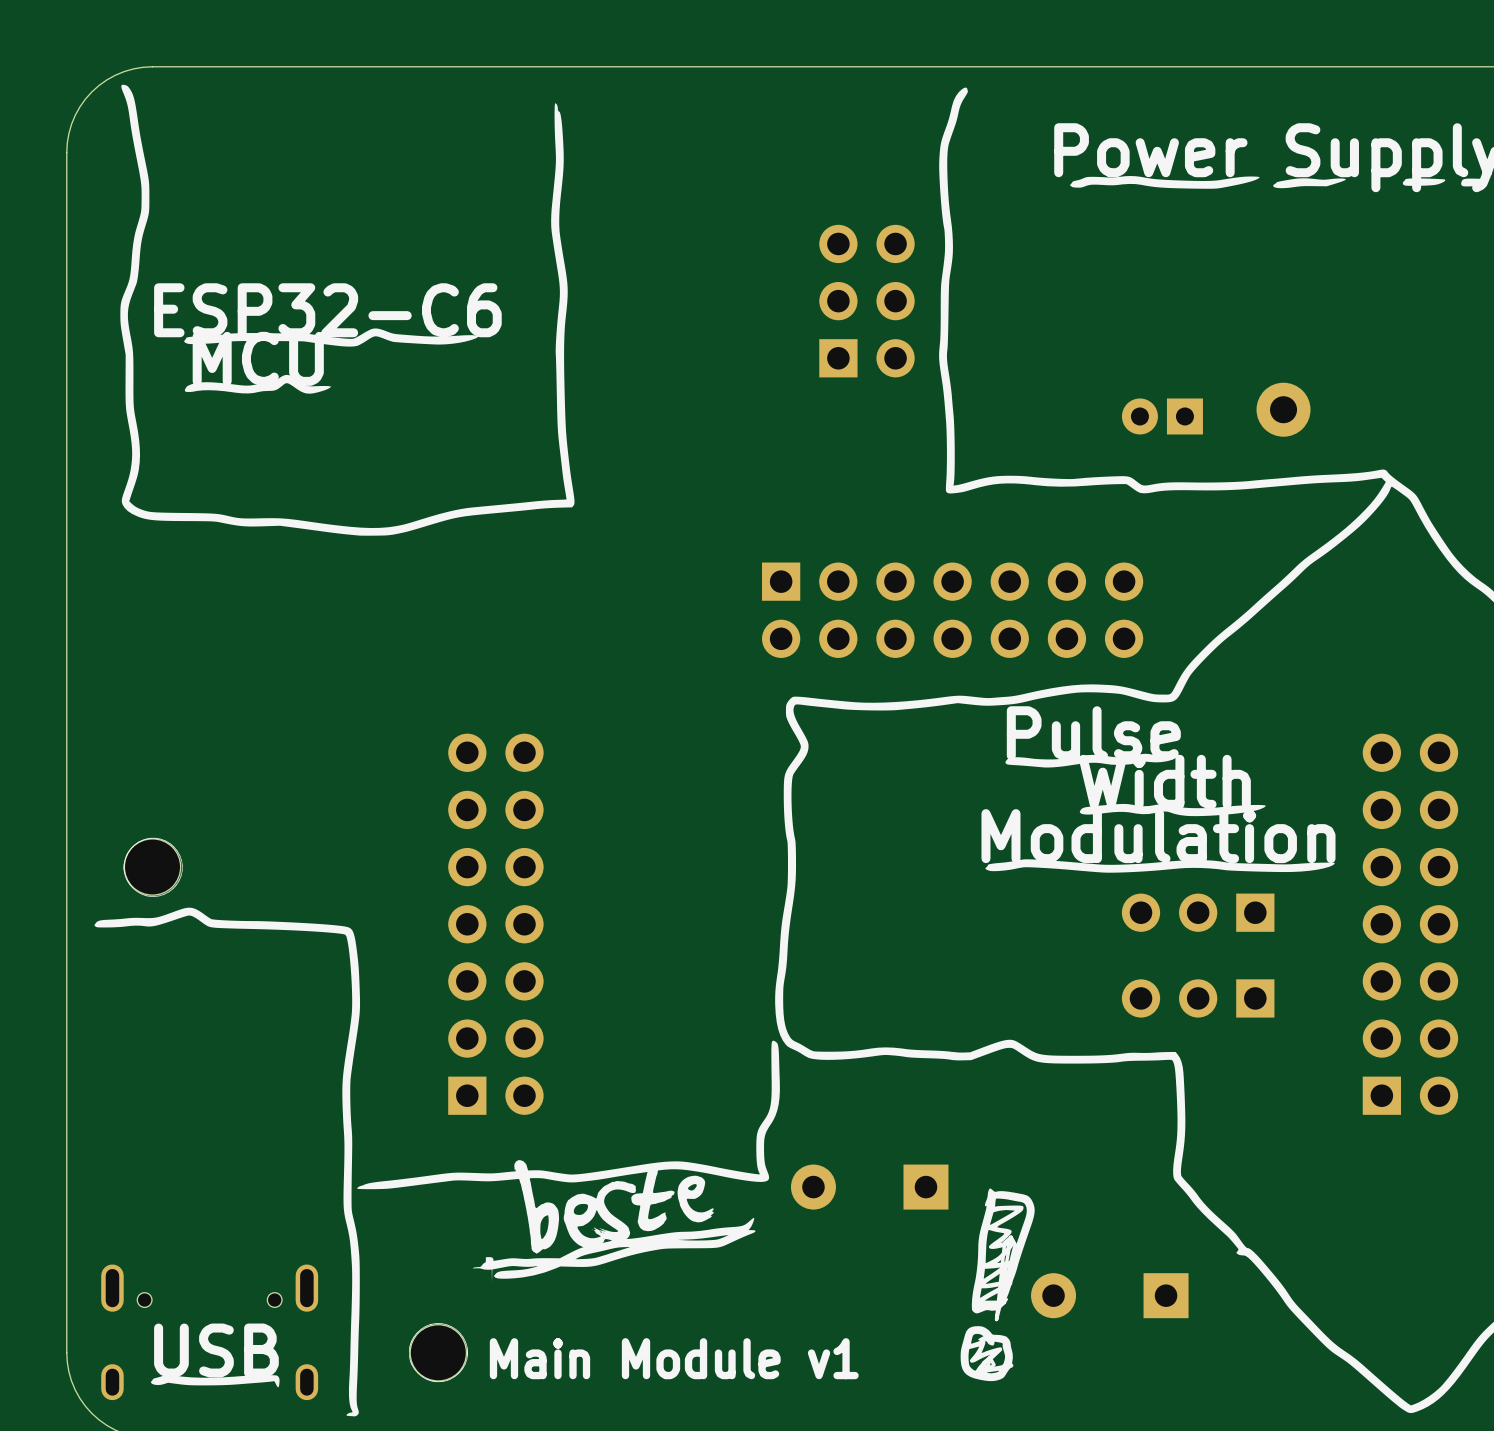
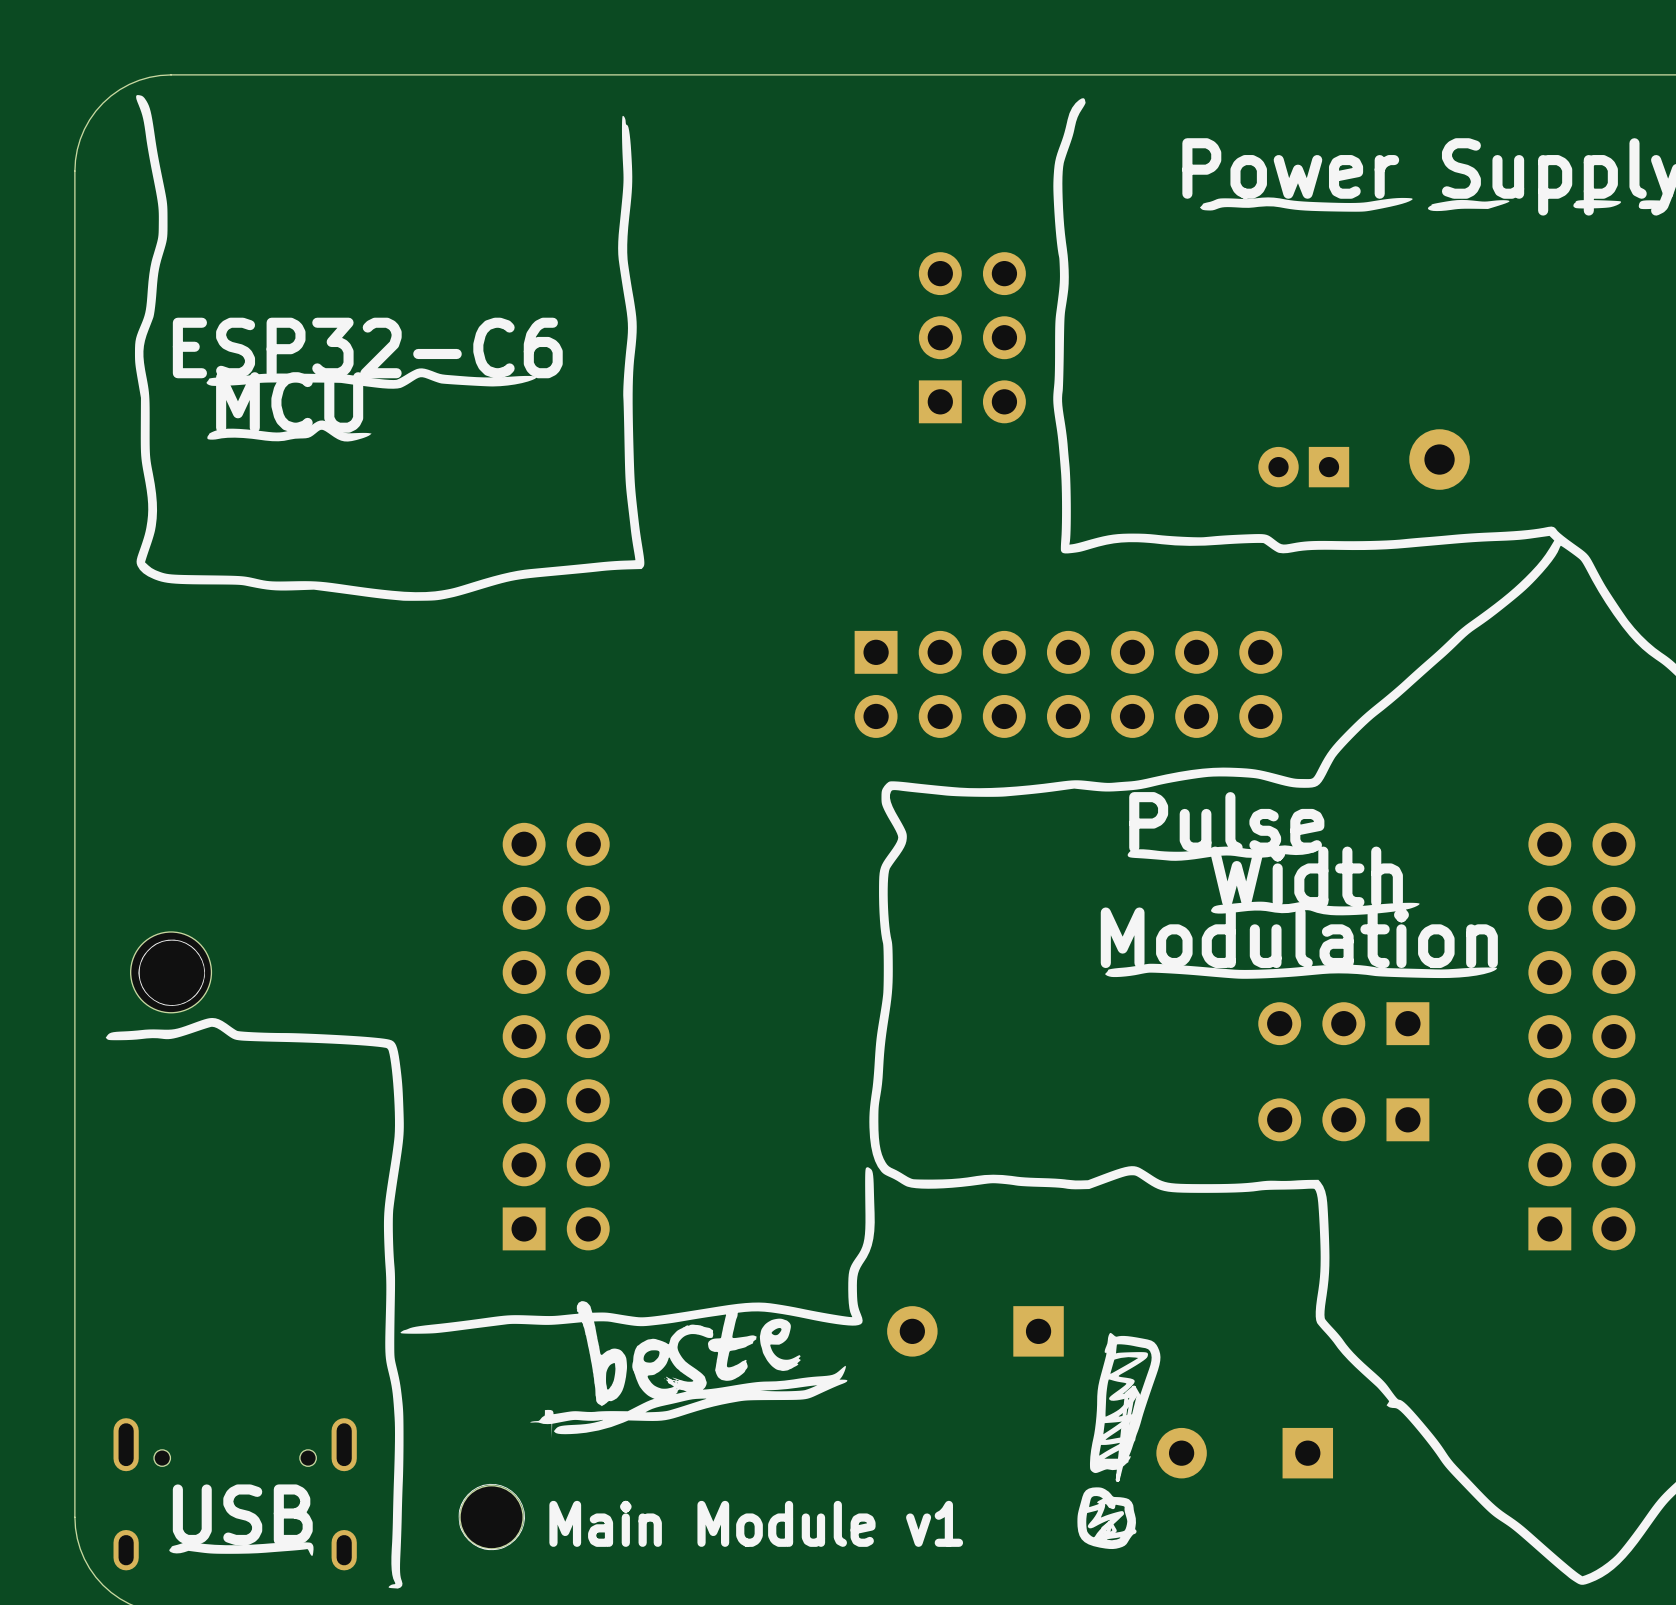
part footprint: [124, 838, 181, 896] -> [130, 931, 212, 1013]

